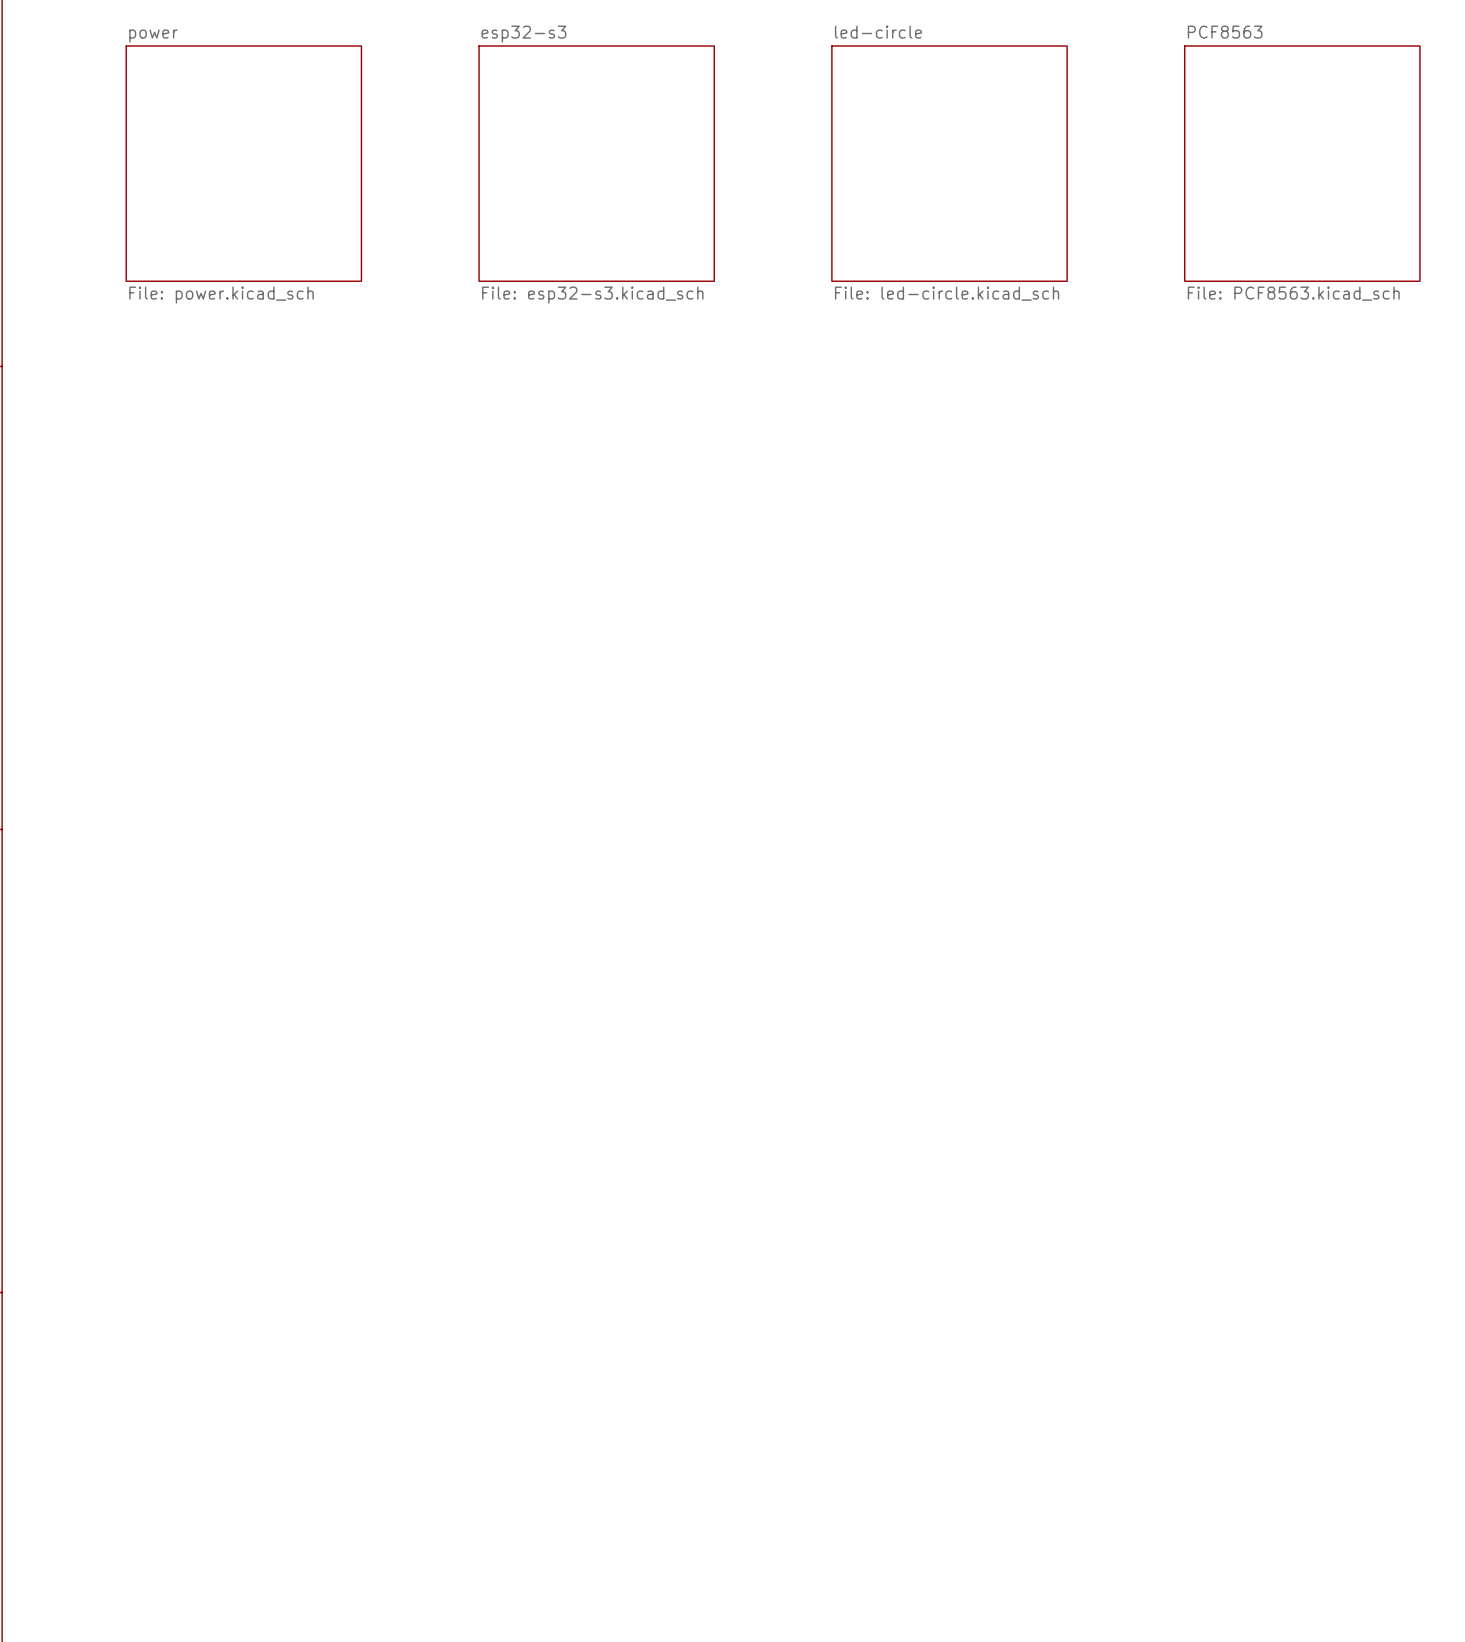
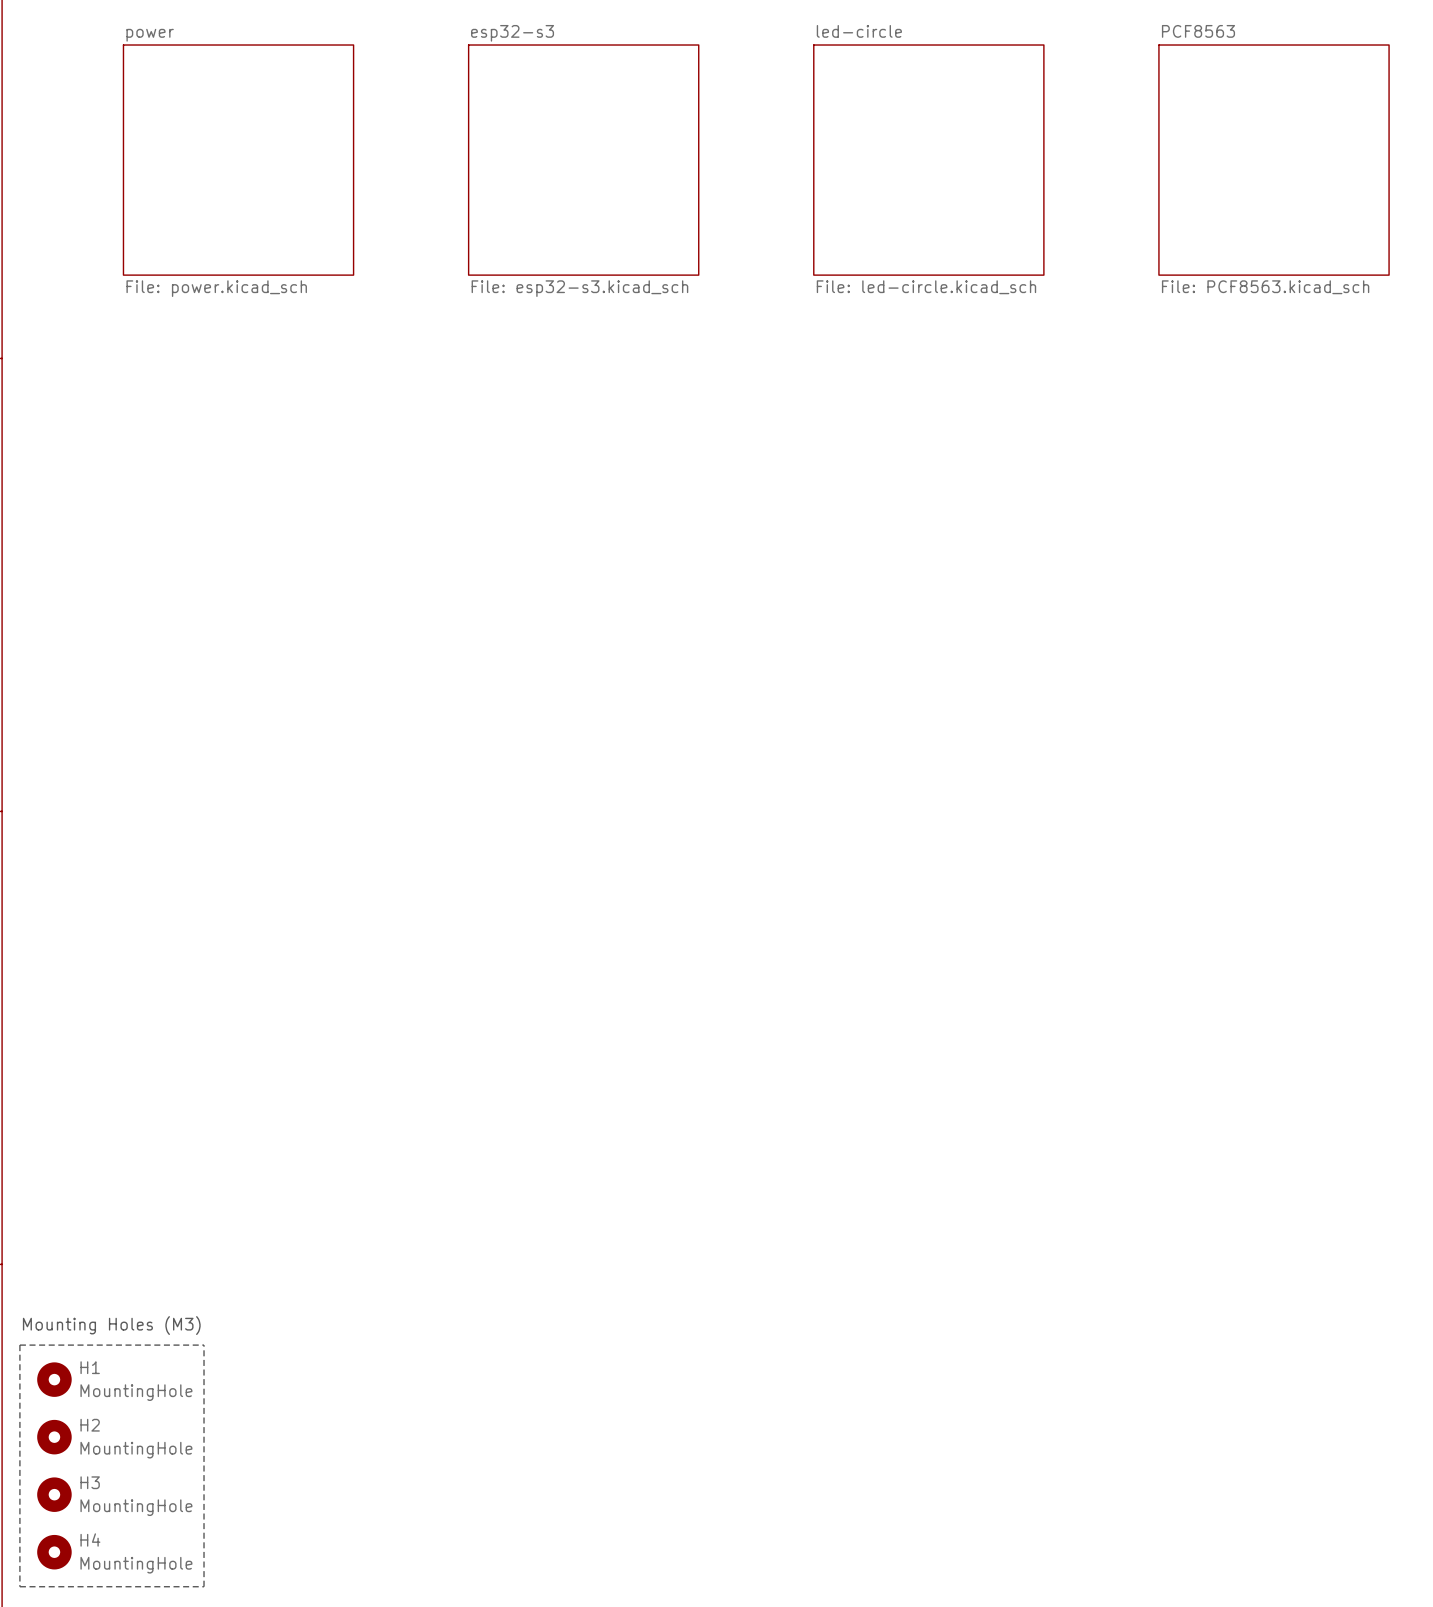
text: none -> Mounting Holes (M3) (111, 1325)
line: none -> (19, 1345) (204, 1345) (204, 1586) (19, 1586) (19, 1345)
H1: none -> MountingHole (54, 1379)
H2: none -> MountingHole (54, 1437)
H3: none -> MountingHole (54, 1494)
H4: none -> MountingHole (54, 1552)

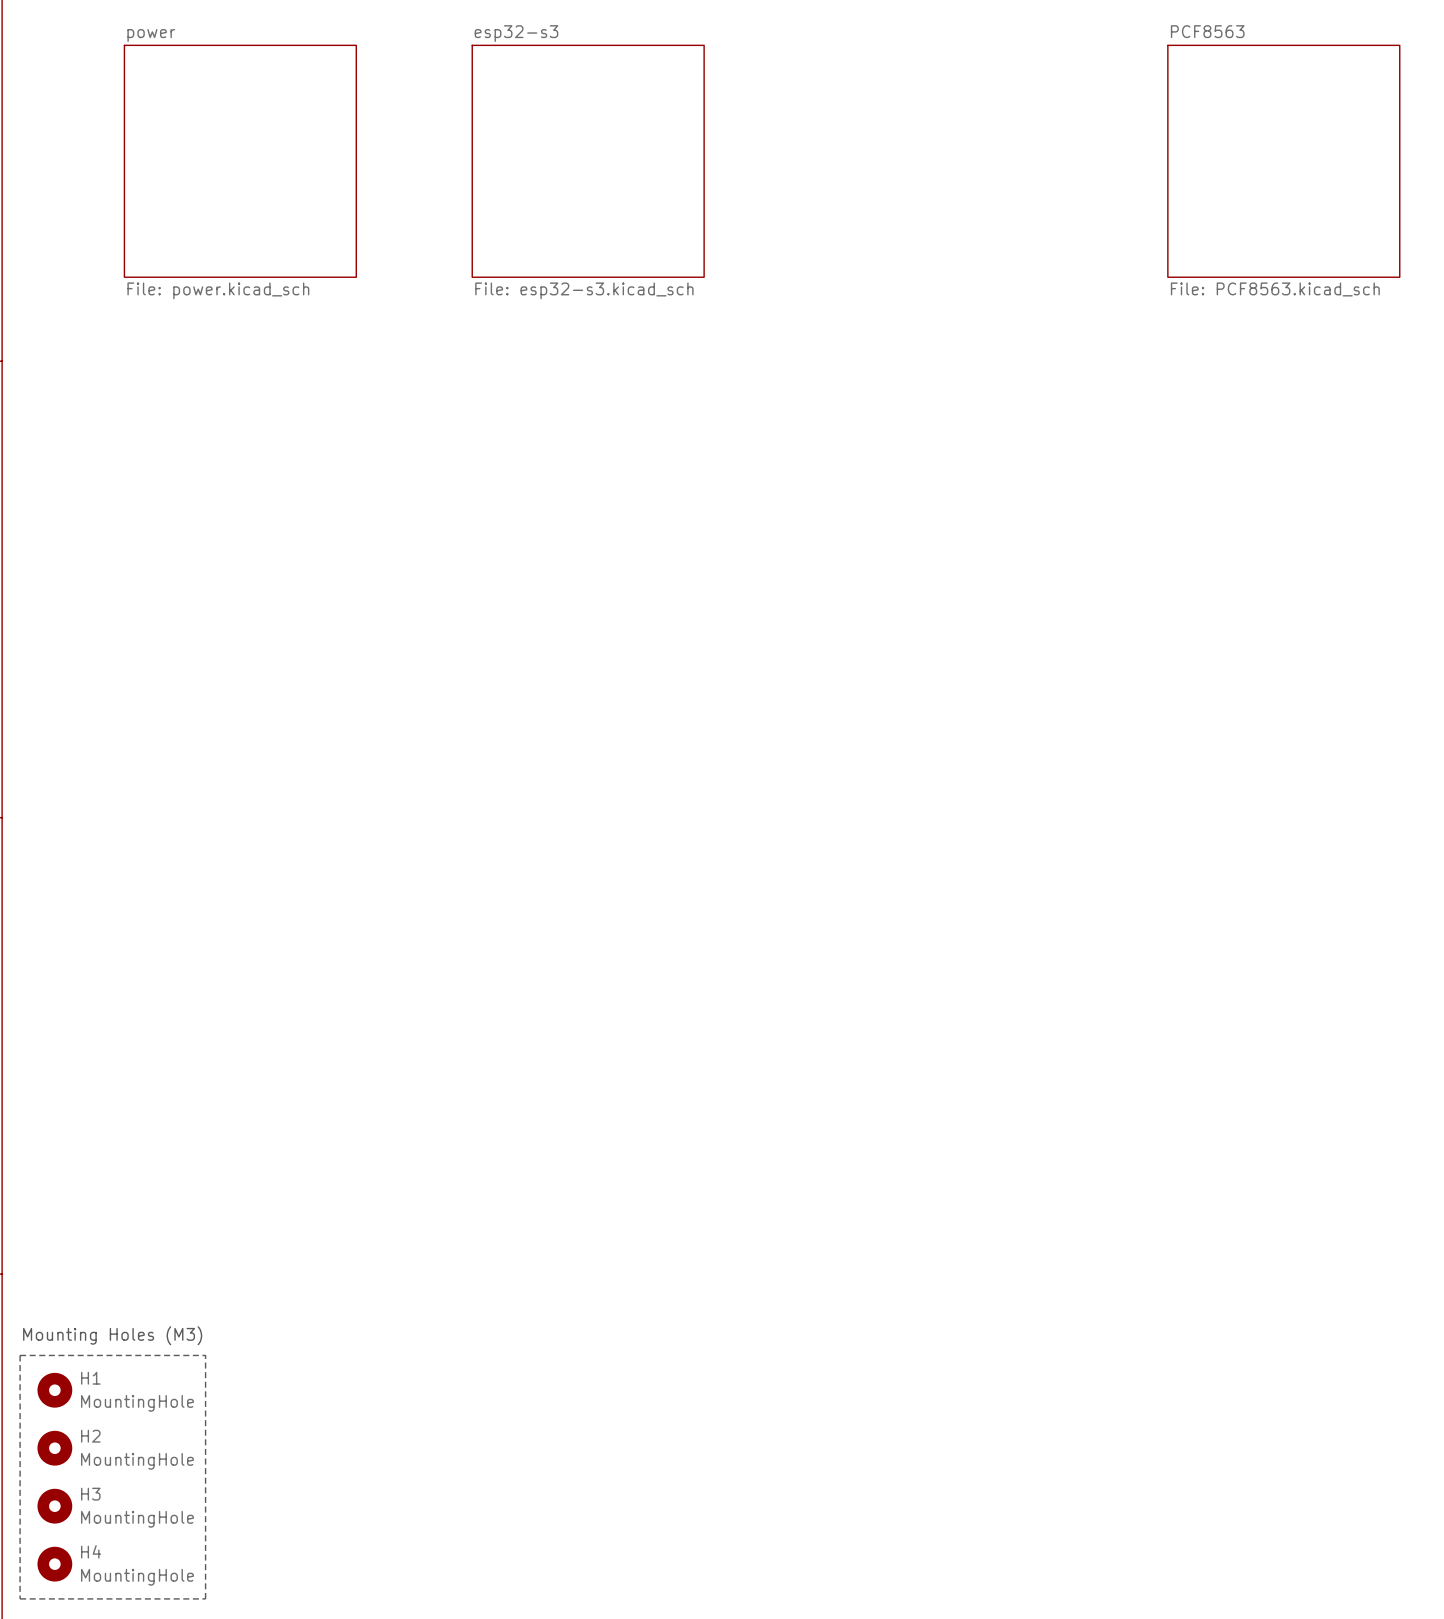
sheet led-circle: File: led-circle.kicad_sch (928, 160) -> none

